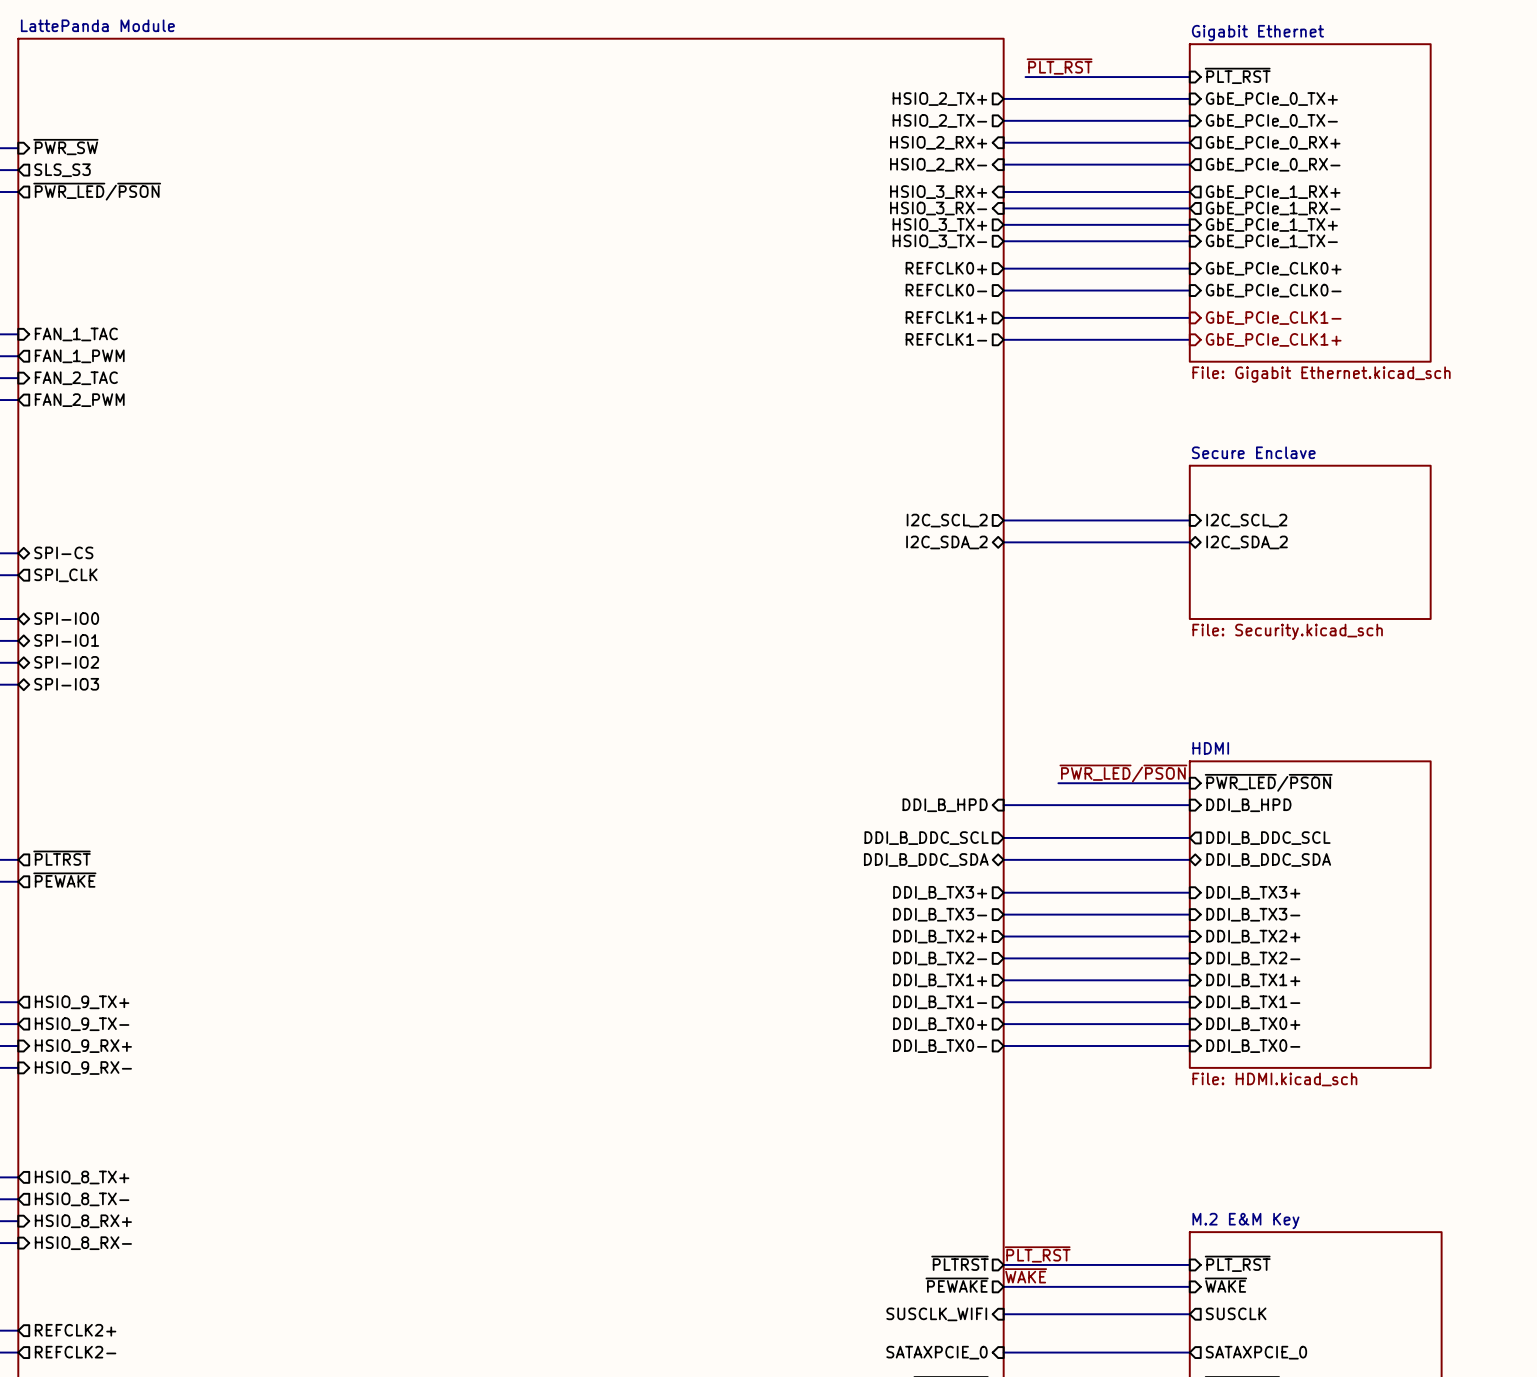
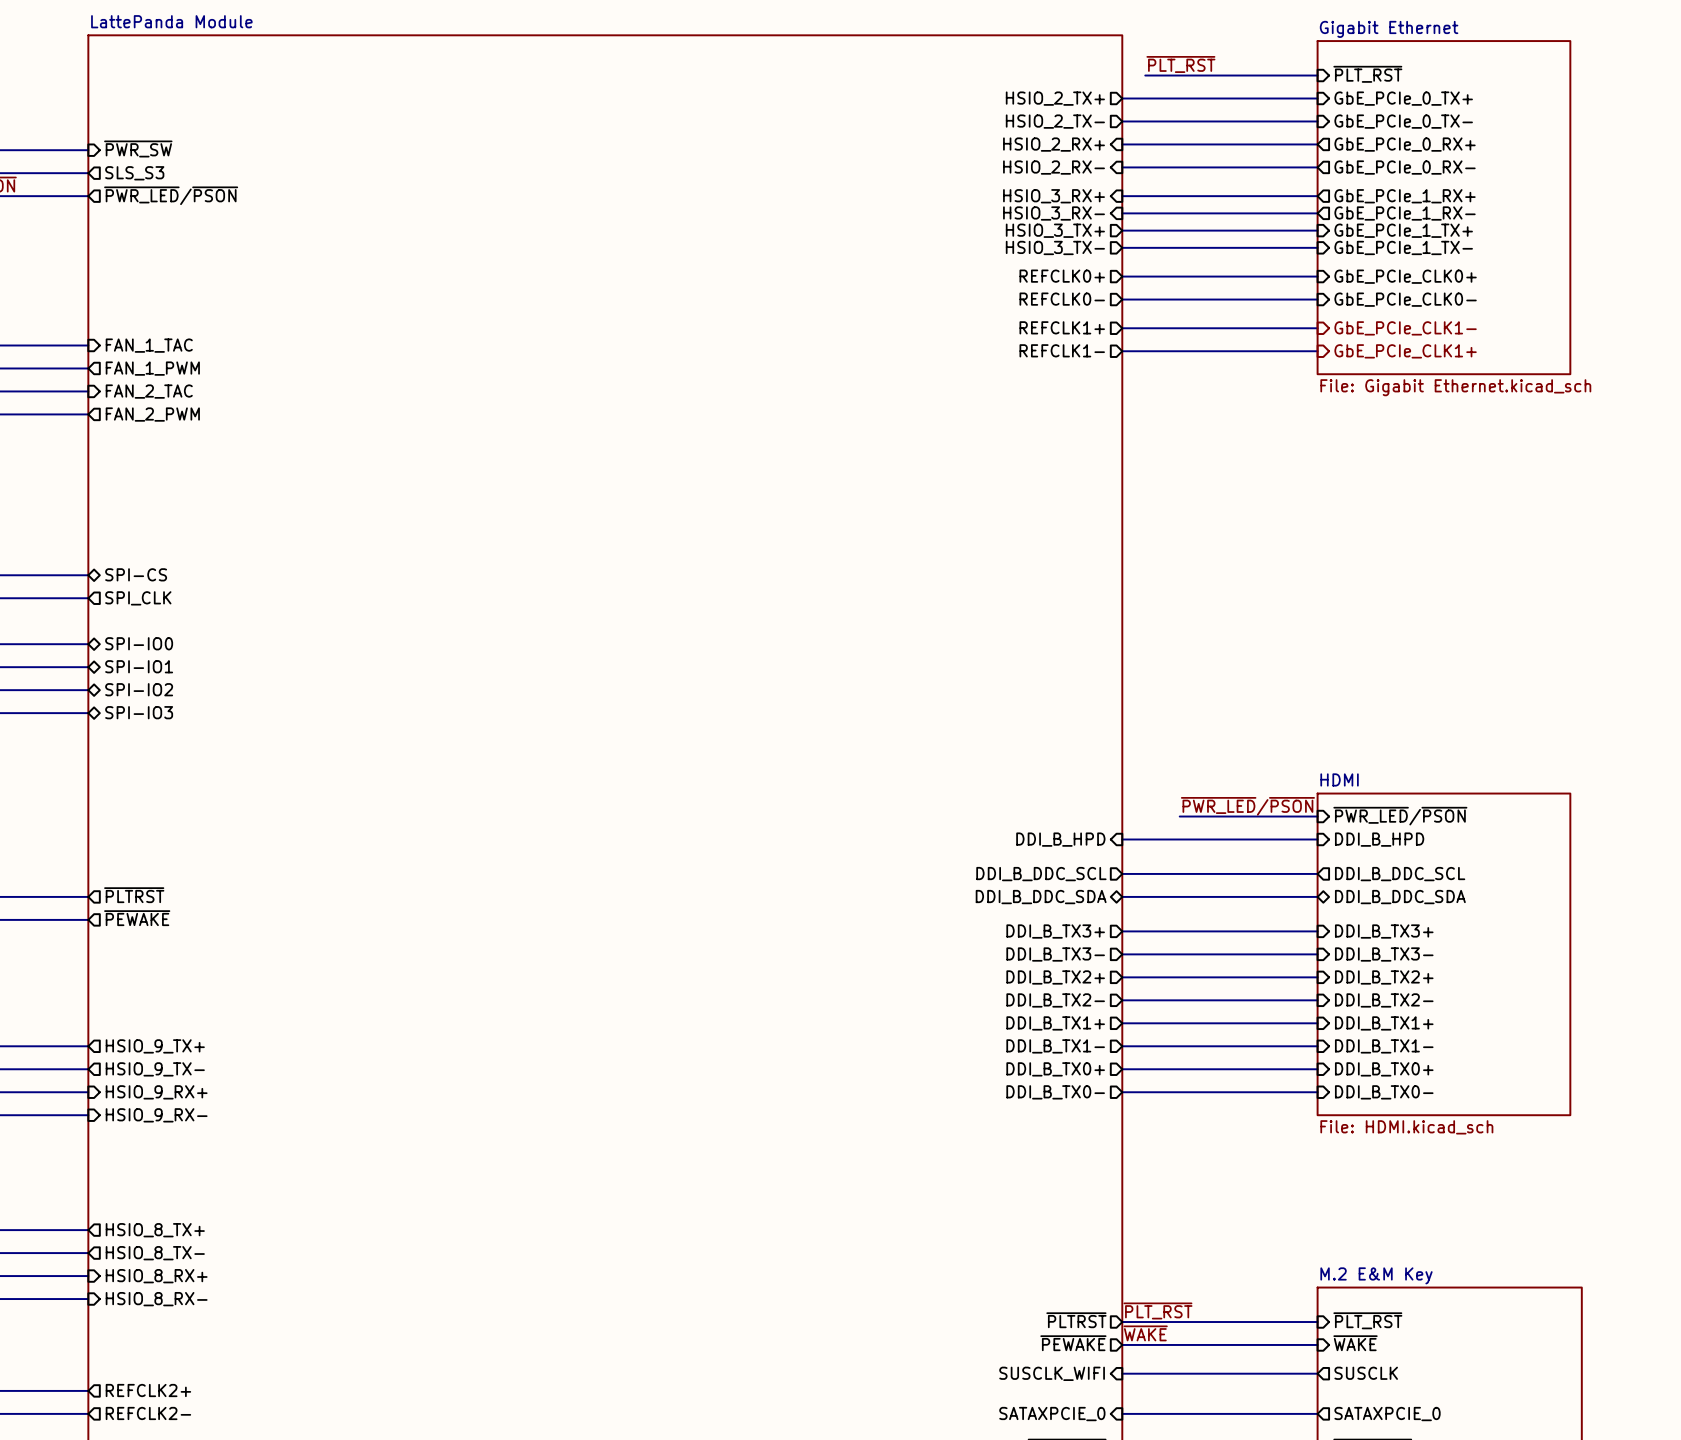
sheet pin: I2C_SCL_2 (947, 520) -> none
wire: (1003, 520) (1189, 520) -> none
sheet pin: I2C_SCL_2 (1246, 520) -> none
sheet pin: I2C_SDA_2 (946, 542) -> none
wire: (1003, 542) (1189, 542) -> none
sheet pin: I2C_SDA_2 (1247, 542) -> none
sheet Secure Enclave: File: Security.kicad_sch (1310, 542) -> none

